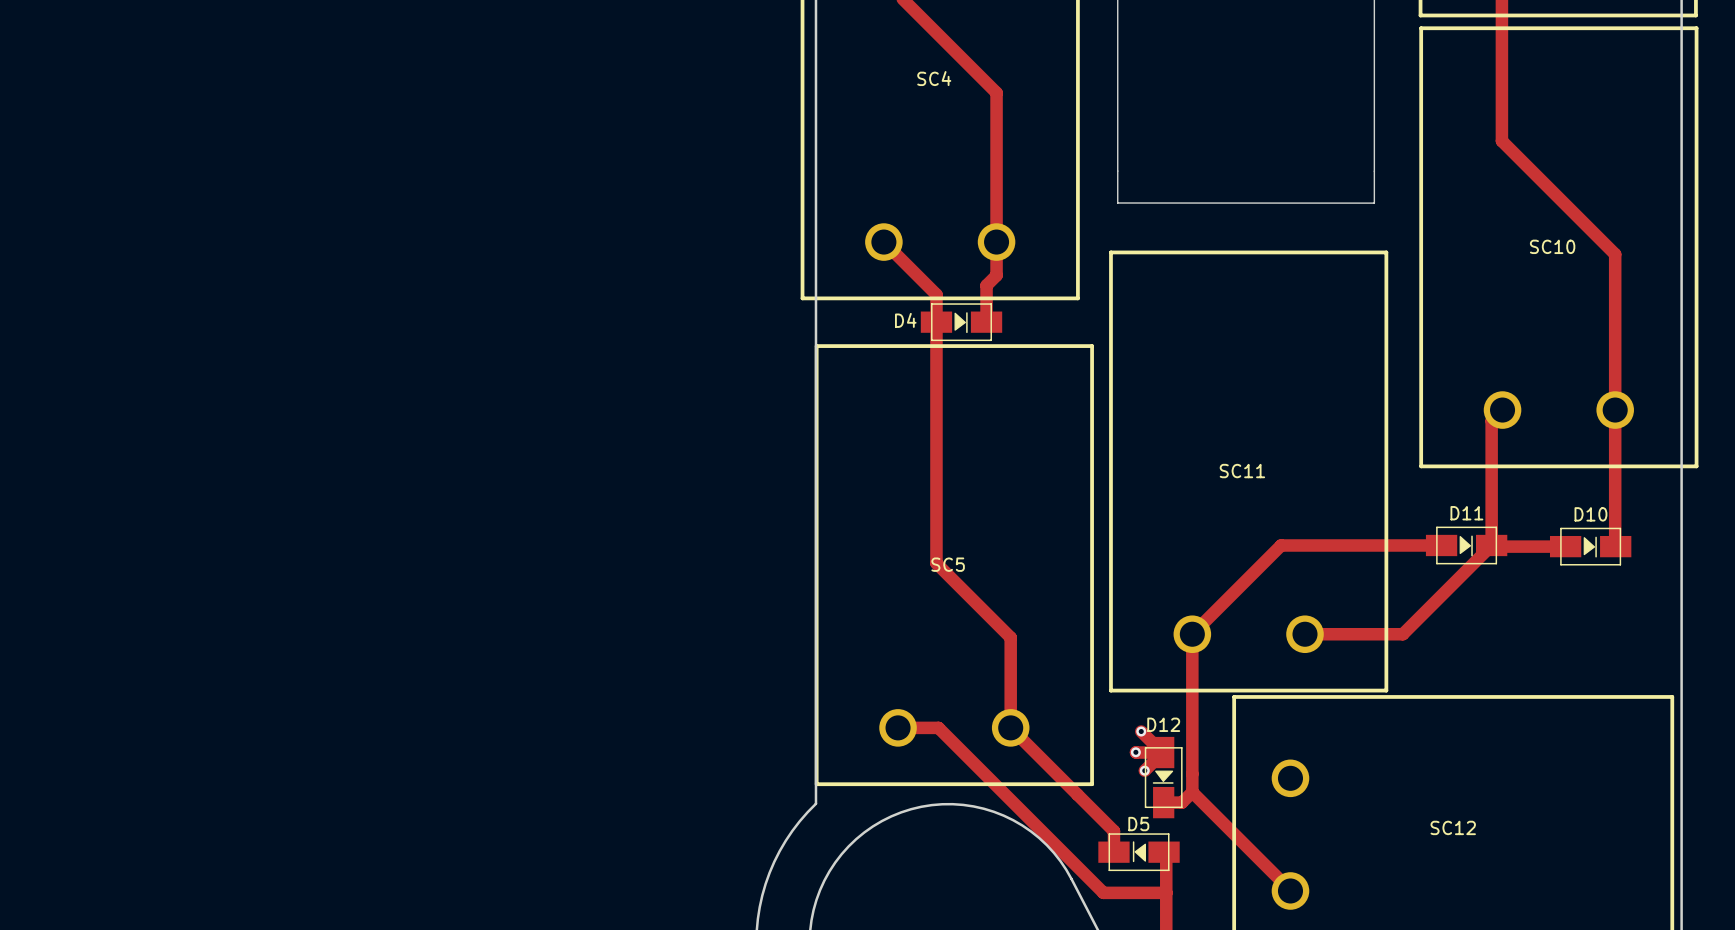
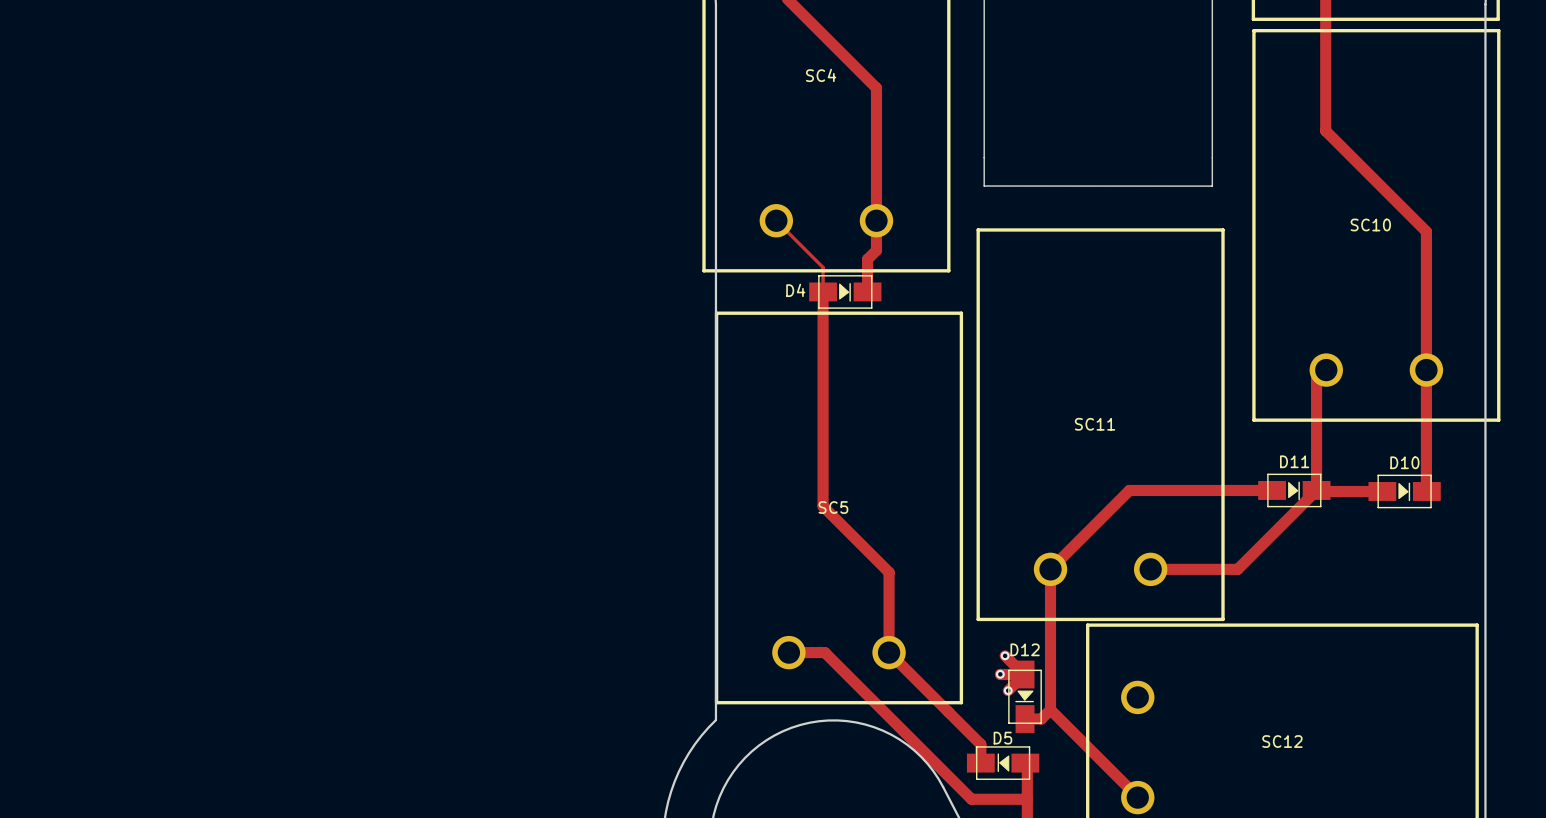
top track width: thick (883, 242) (936, 294) (936, 322) -> thin (776, 220) (823, 267) (823, 291)

